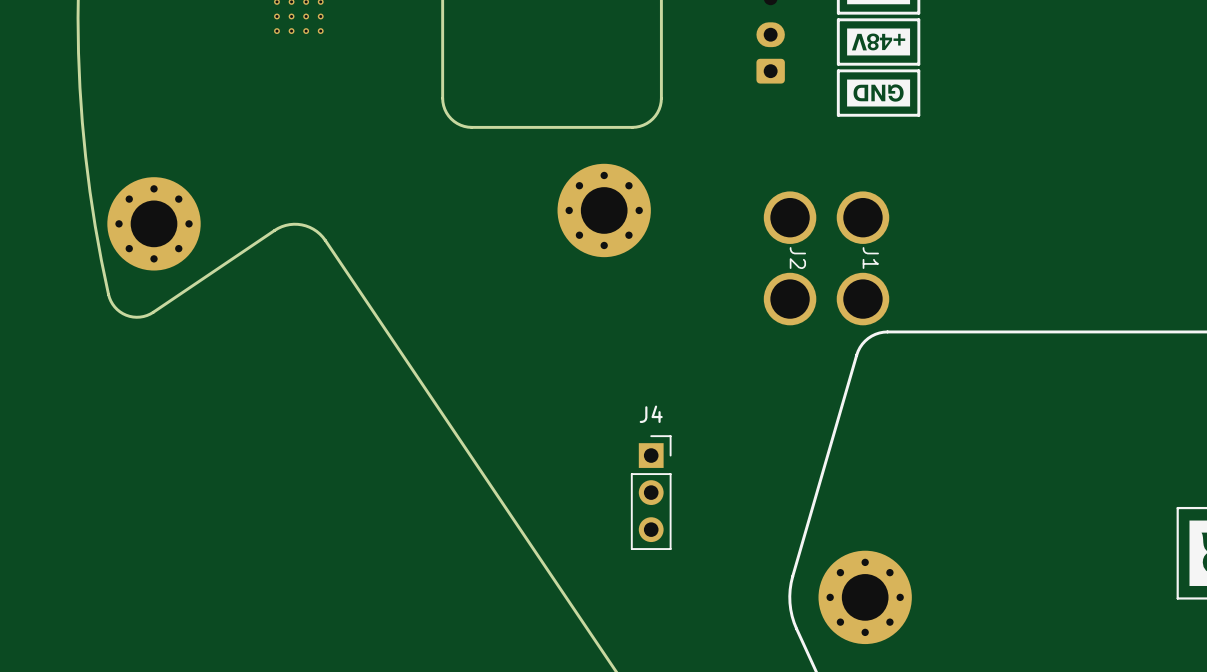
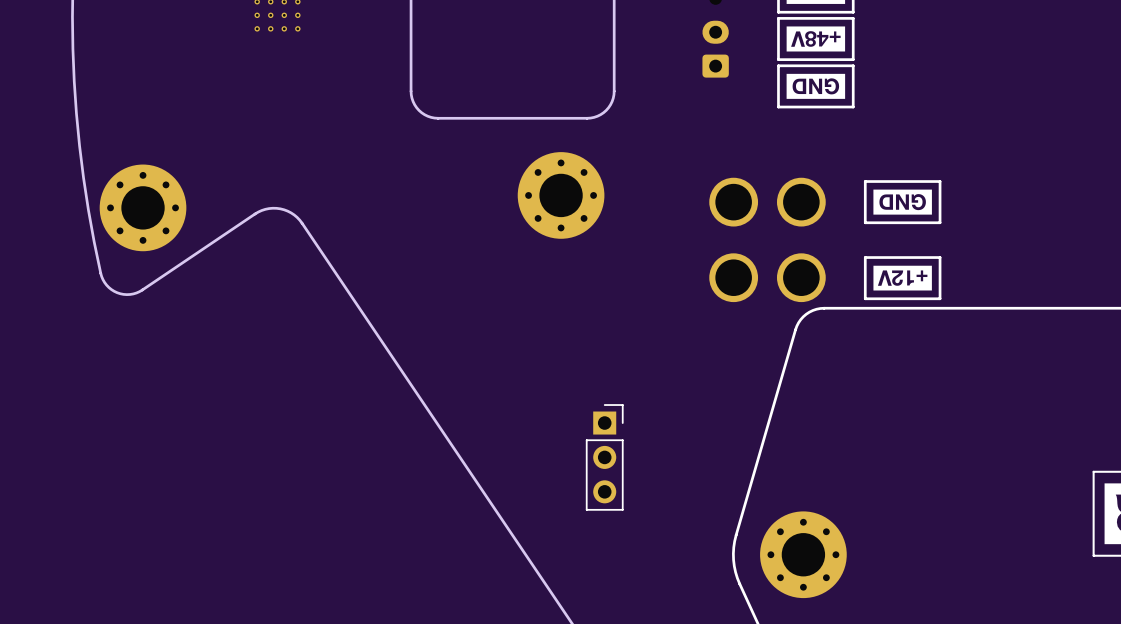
line: none -> (865, 181) (865, 222) (940, 222) (940, 181) (865, 181)
drawing: none -> [873, 189, 932, 215]
J2 name: J2 (797, 258) -> none
J1 name: J1 (870, 258) -> none
line: none -> (865, 257) (940, 257) (940, 298) (865, 298) (865, 257)
drawing: none -> [873, 265, 932, 291]
J4 name: J4 (651, 414) -> none

